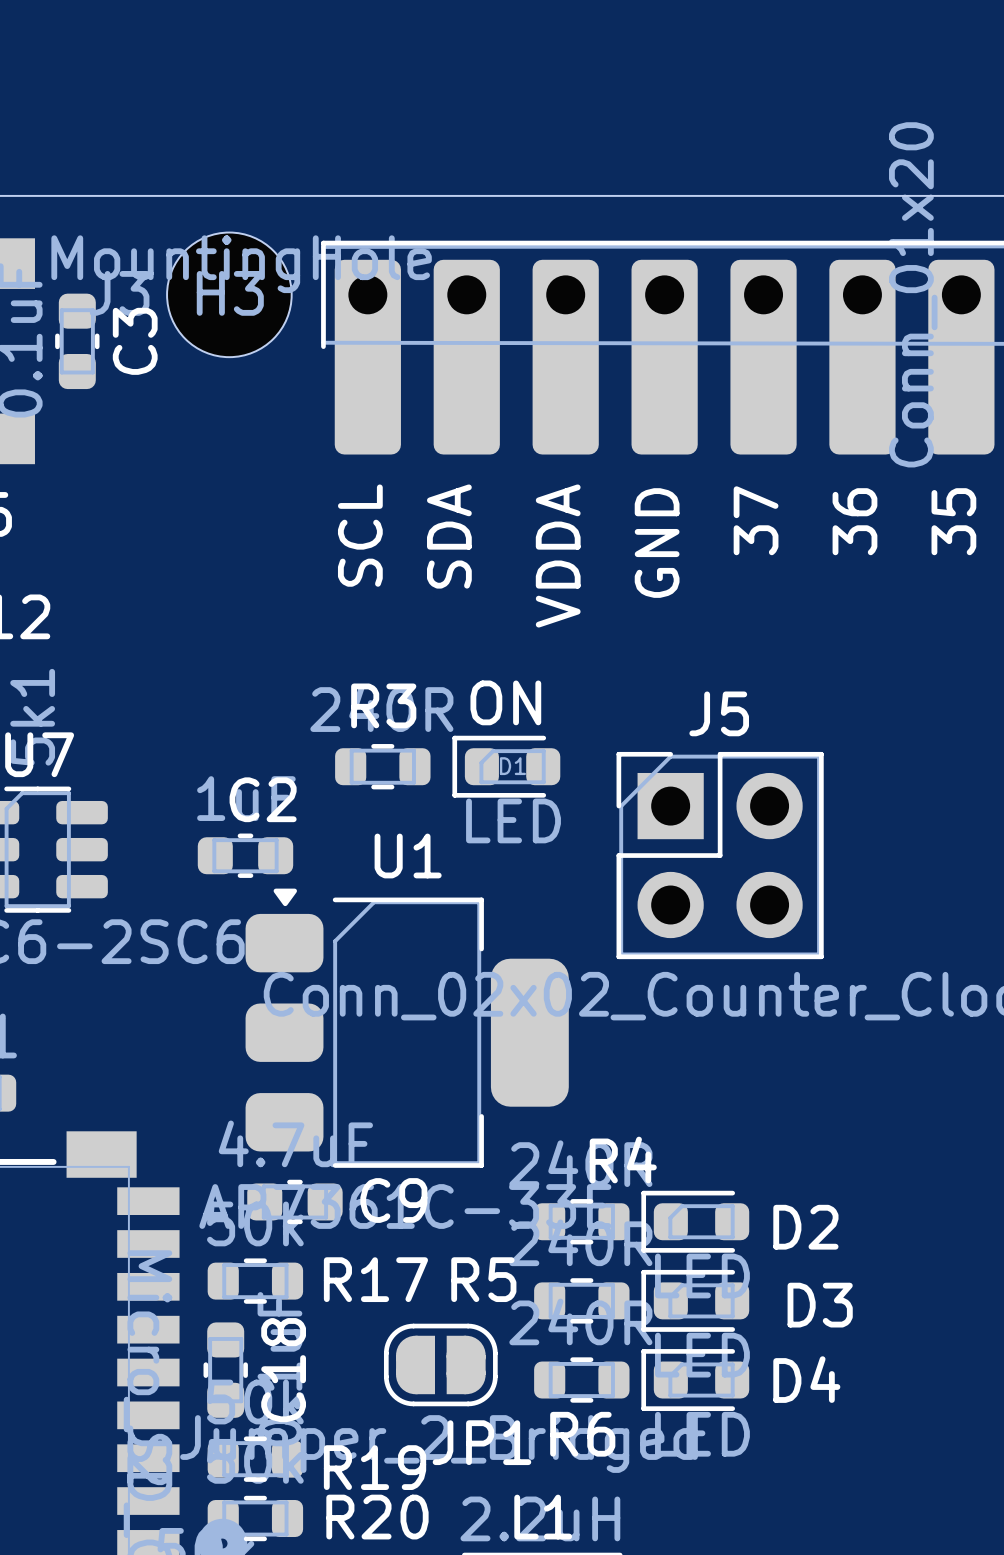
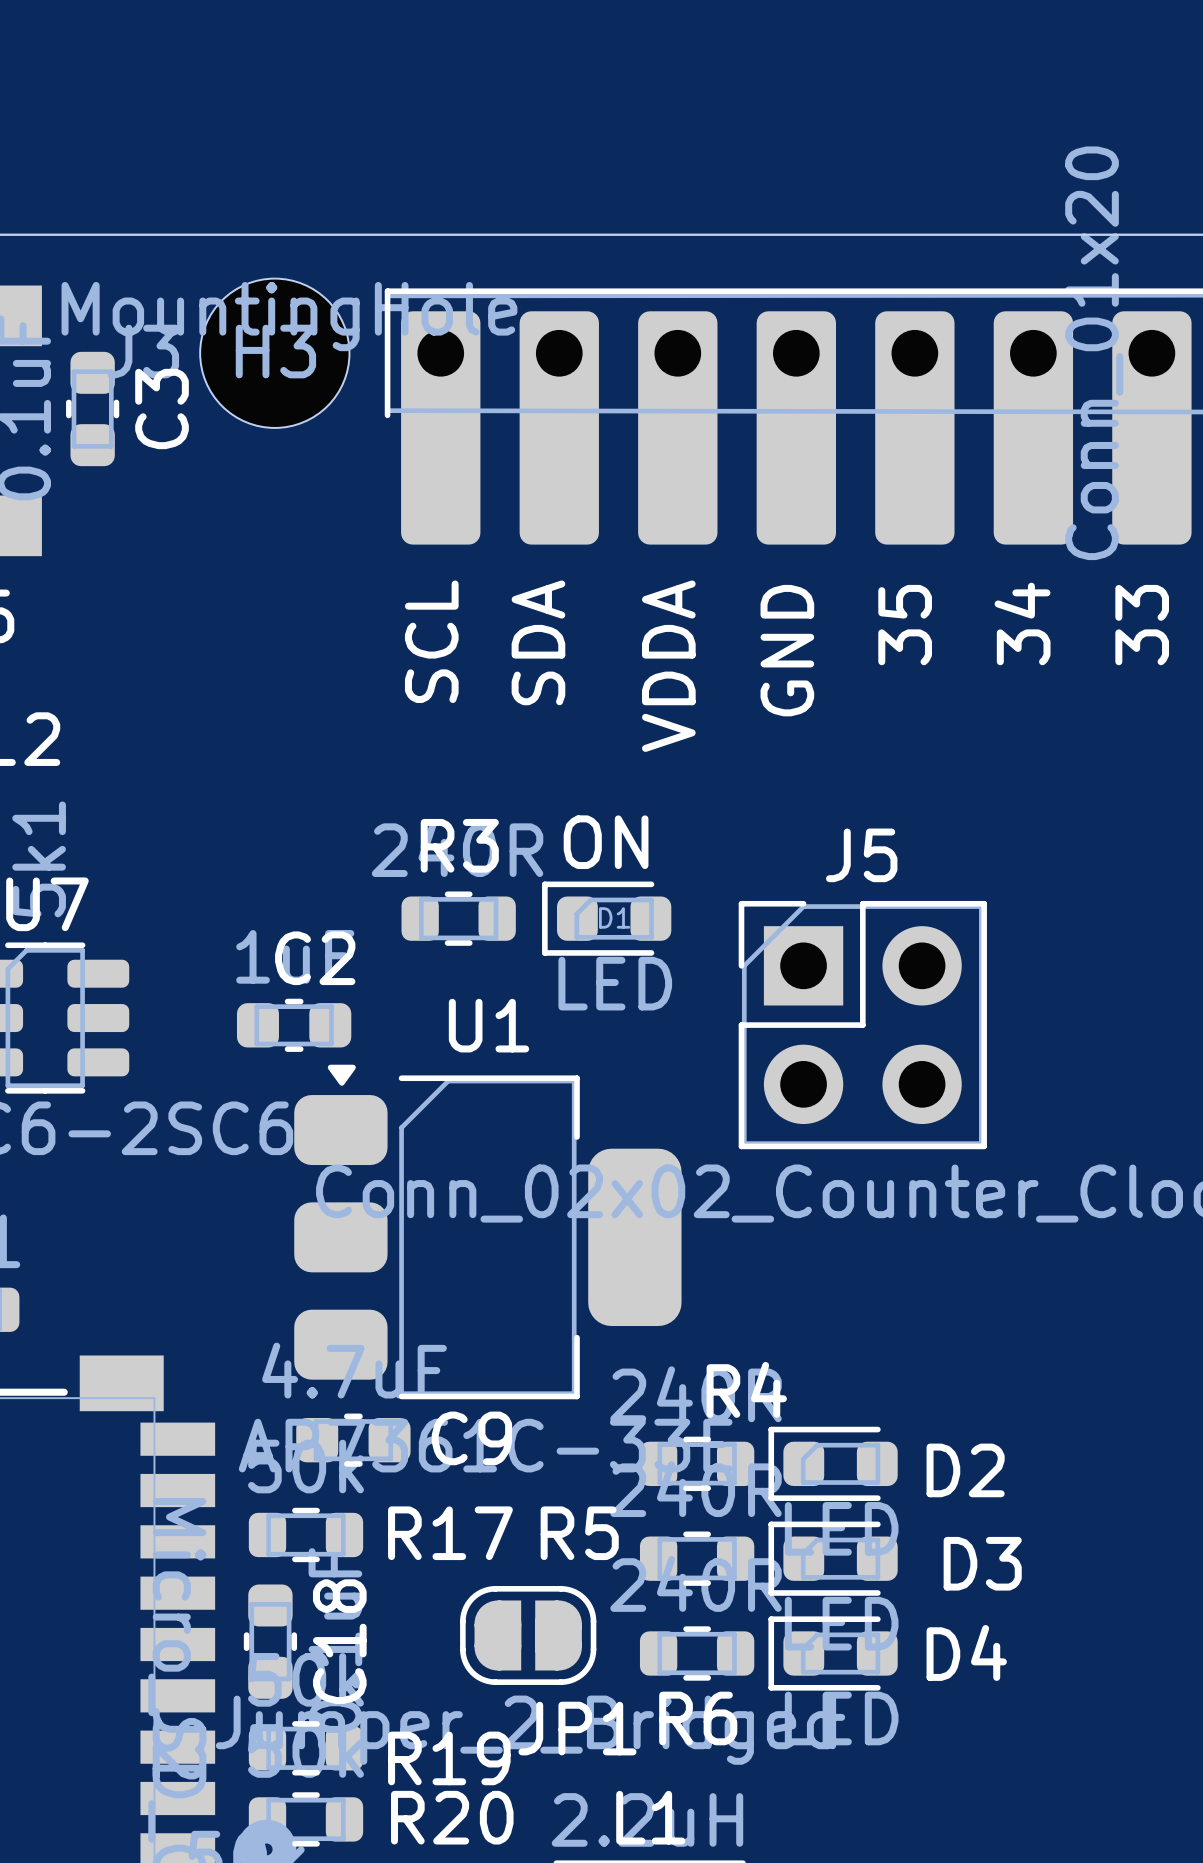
text: 37 (756, 520) -> 35 (905, 625)
text: 36 (854, 521) -> 34 (1022, 623)
text: 35 (953, 521) -> 33 (1142, 625)

